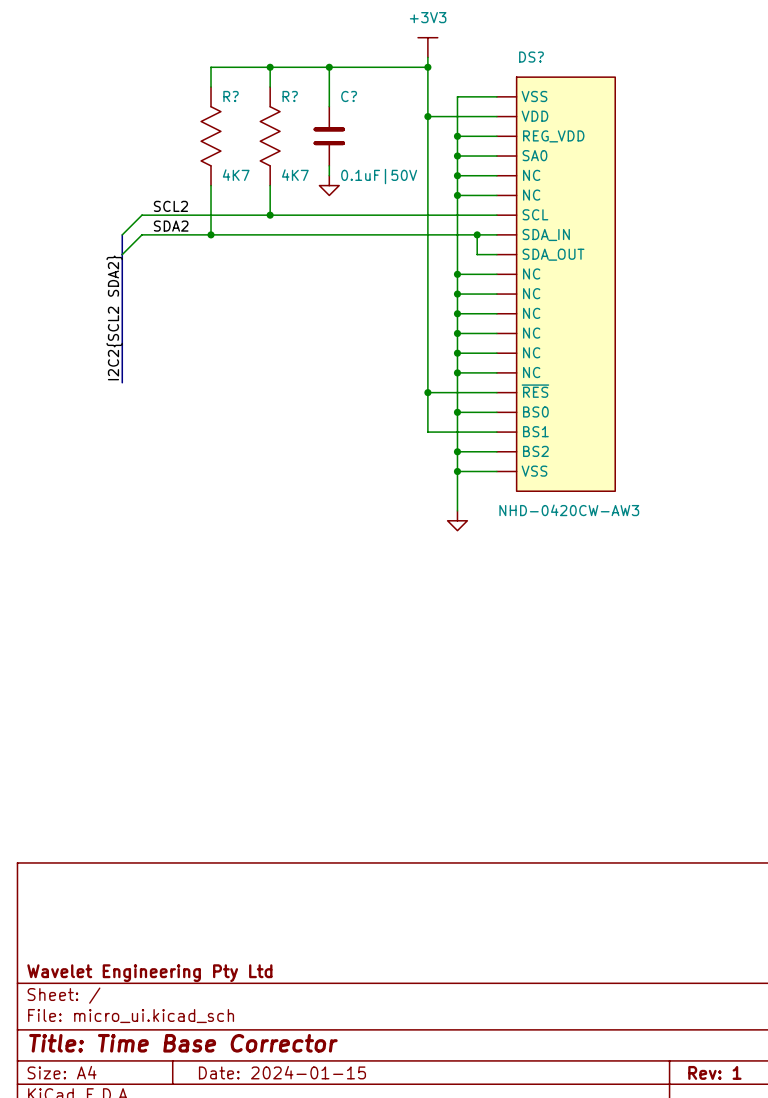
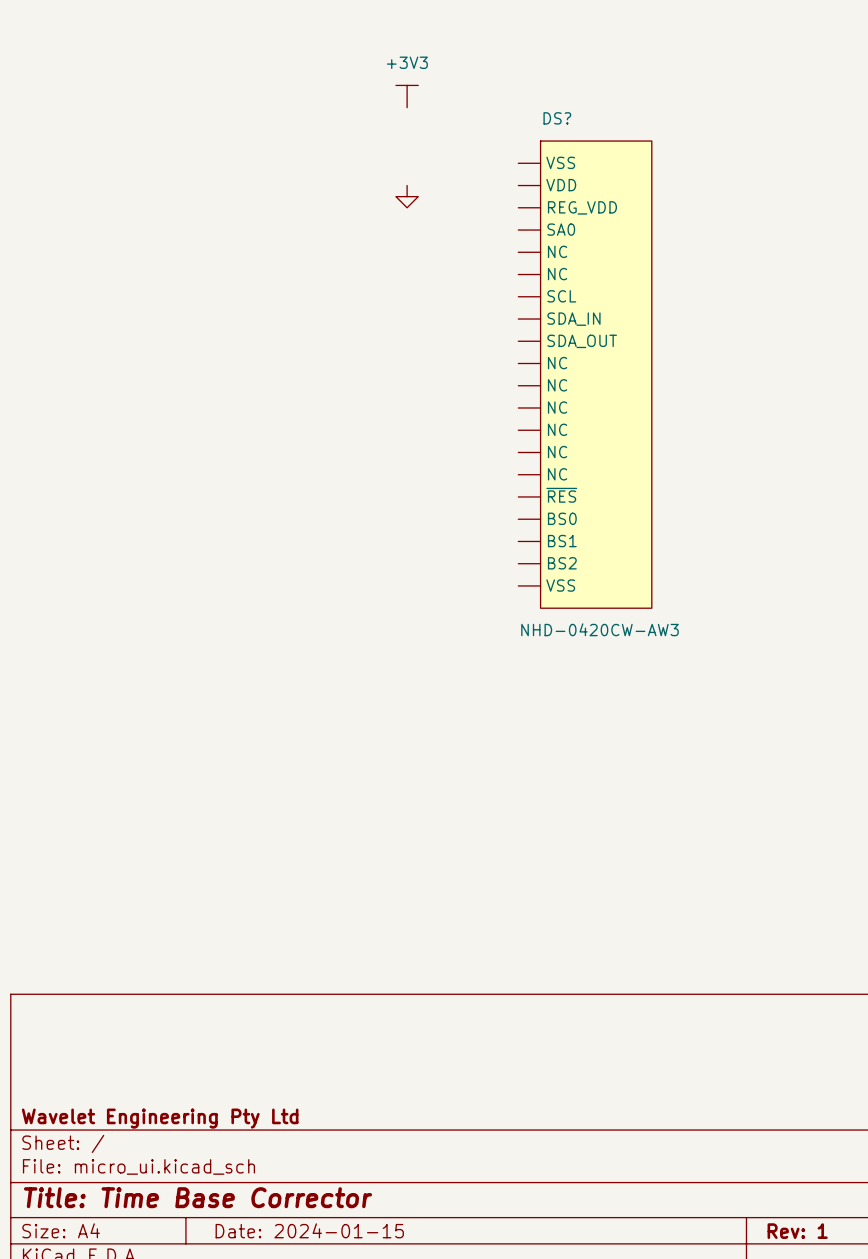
power symbol position: +3V3 (427, 47) -> +3V3 (407, 96)
wire: (427, 57) (427, 432) (496, 432) -> none
wire: (270, 67) (270, 87) -> none
junction: (270, 67) -> none
wire: (329, 67) (329, 106) -> none
junction: (329, 67) -> none
wire: (427, 67) (211, 67) (211, 87) -> none
junction: (427, 67) -> none
wire: (496, 96) (457, 96) (457, 510) -> none
wire: (427, 116) (496, 116) -> none
junction: (427, 116) -> none
R?: 4K7 (211, 136) -> none
R?: 4K7 (270, 136) -> none
C?: 0.1uF|50V (329, 136) -> none
wire: (457, 136) (496, 136) -> none
junction: (457, 136) -> none
wire: (457, 156) (496, 156) -> none
junction: (457, 156) -> none
wire: (329, 165) (329, 175) -> none
wire: (457, 175) (496, 175) -> none
junction: (457, 175) -> none
wire: (211, 185) (211, 234) -> none
wire: (270, 185) (270, 215) -> none
power symbol position: (329, 185) -> (407, 196)
wire: (457, 195) (496, 195) -> none
junction: (457, 195) -> none
label: SCL2 (170, 206) -> none
junction: (270, 215) -> none
wire: (496, 215) (141, 215) (122, 234) -> none
label: SDA2 (171, 226) -> none
bus: (122, 234) (122, 382) -> none
junction: (211, 234) -> none
wire: (477, 234) (477, 254) (496, 254) -> none
junction: (477, 234) -> none
wire: (496, 234) (141, 234) (122, 254) -> none
wire: (457, 274) (496, 274) -> none
junction: (457, 274) -> none
DS? position: (556, 284) -> (585, 374)
wire: (457, 294) (496, 294) -> none
junction: (457, 294) -> none
wire: (457, 313) (496, 313) -> none
junction: (457, 313) -> none
label: I2C2{SCL2 SDA2} (114, 317) -> none
wire: (457, 333) (496, 333) -> none
junction: (457, 333) -> none
wire: (457, 353) (496, 353) -> none
junction: (457, 353) -> none
wire: (457, 372) (496, 372) -> none
junction: (457, 372) -> none
wire: (427, 392) (496, 392) -> none
junction: (427, 392) -> none
wire: (457, 412) (496, 412) -> none
junction: (457, 412) -> none
wire: (457, 451) (496, 451) -> none
junction: (457, 451) -> none
wire: (457, 471) (496, 471) -> none
junction: (457, 471) -> none
power symbol: (457, 520) -> none

